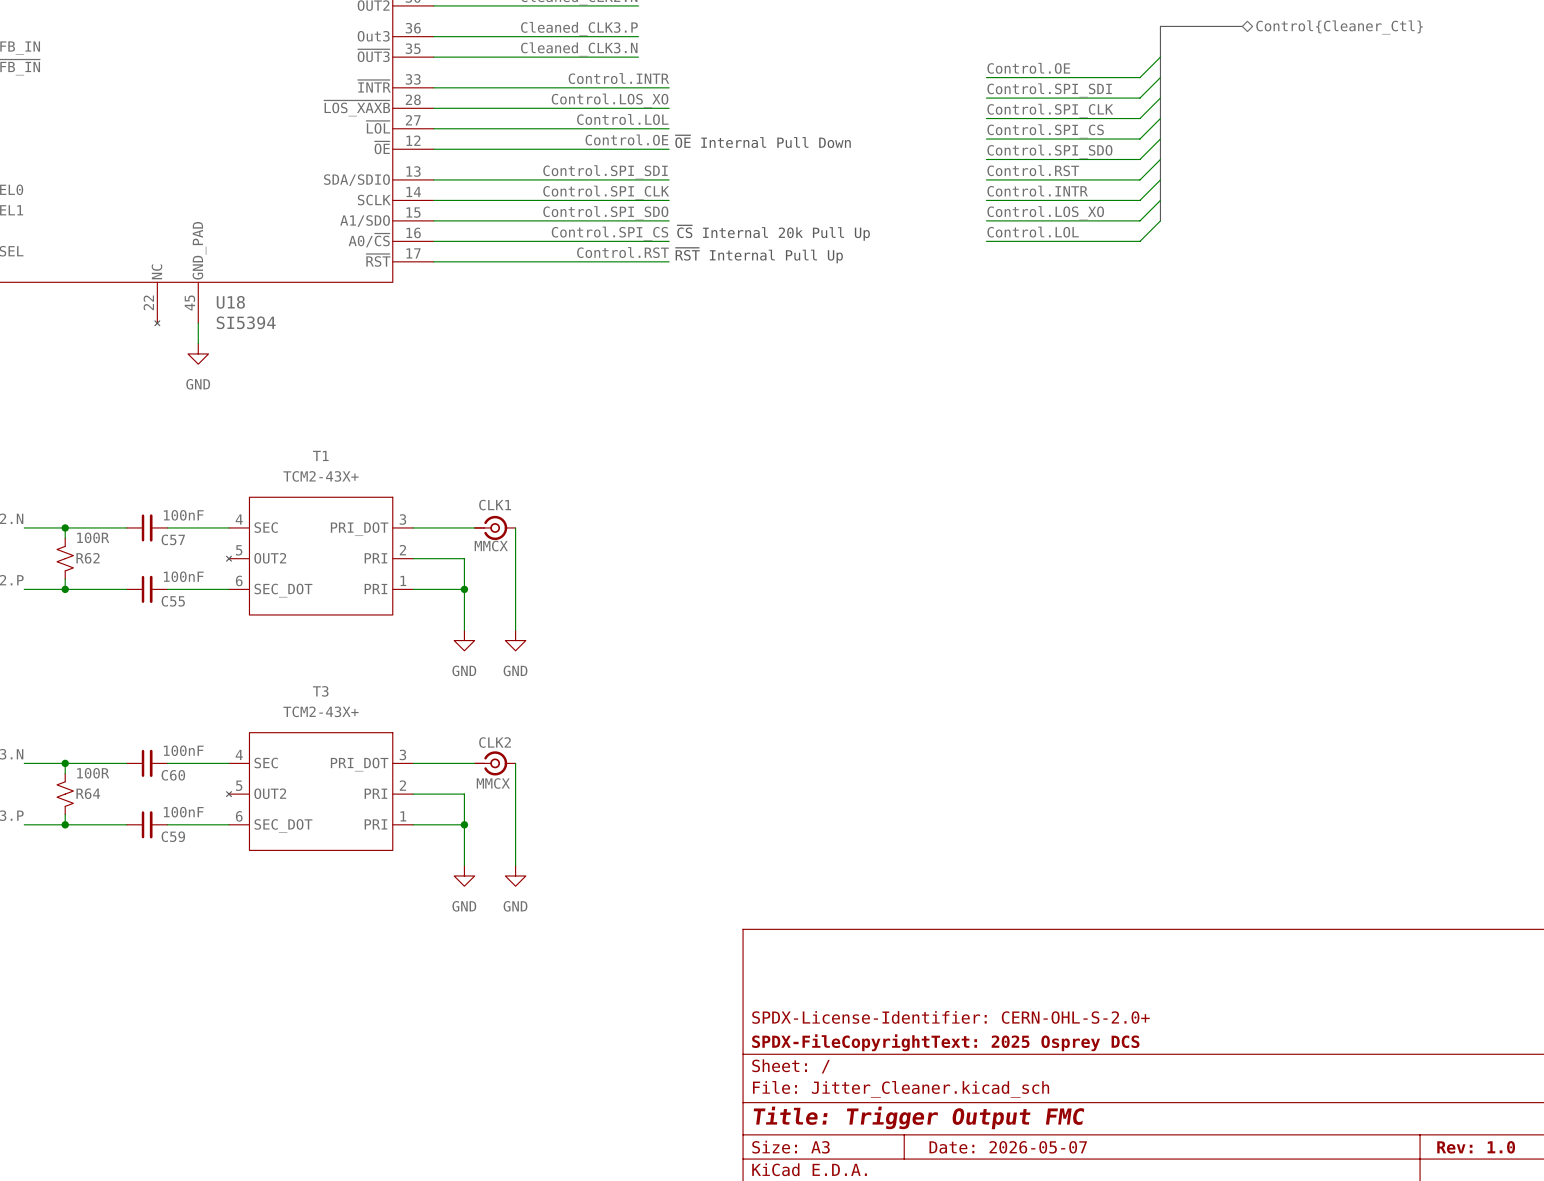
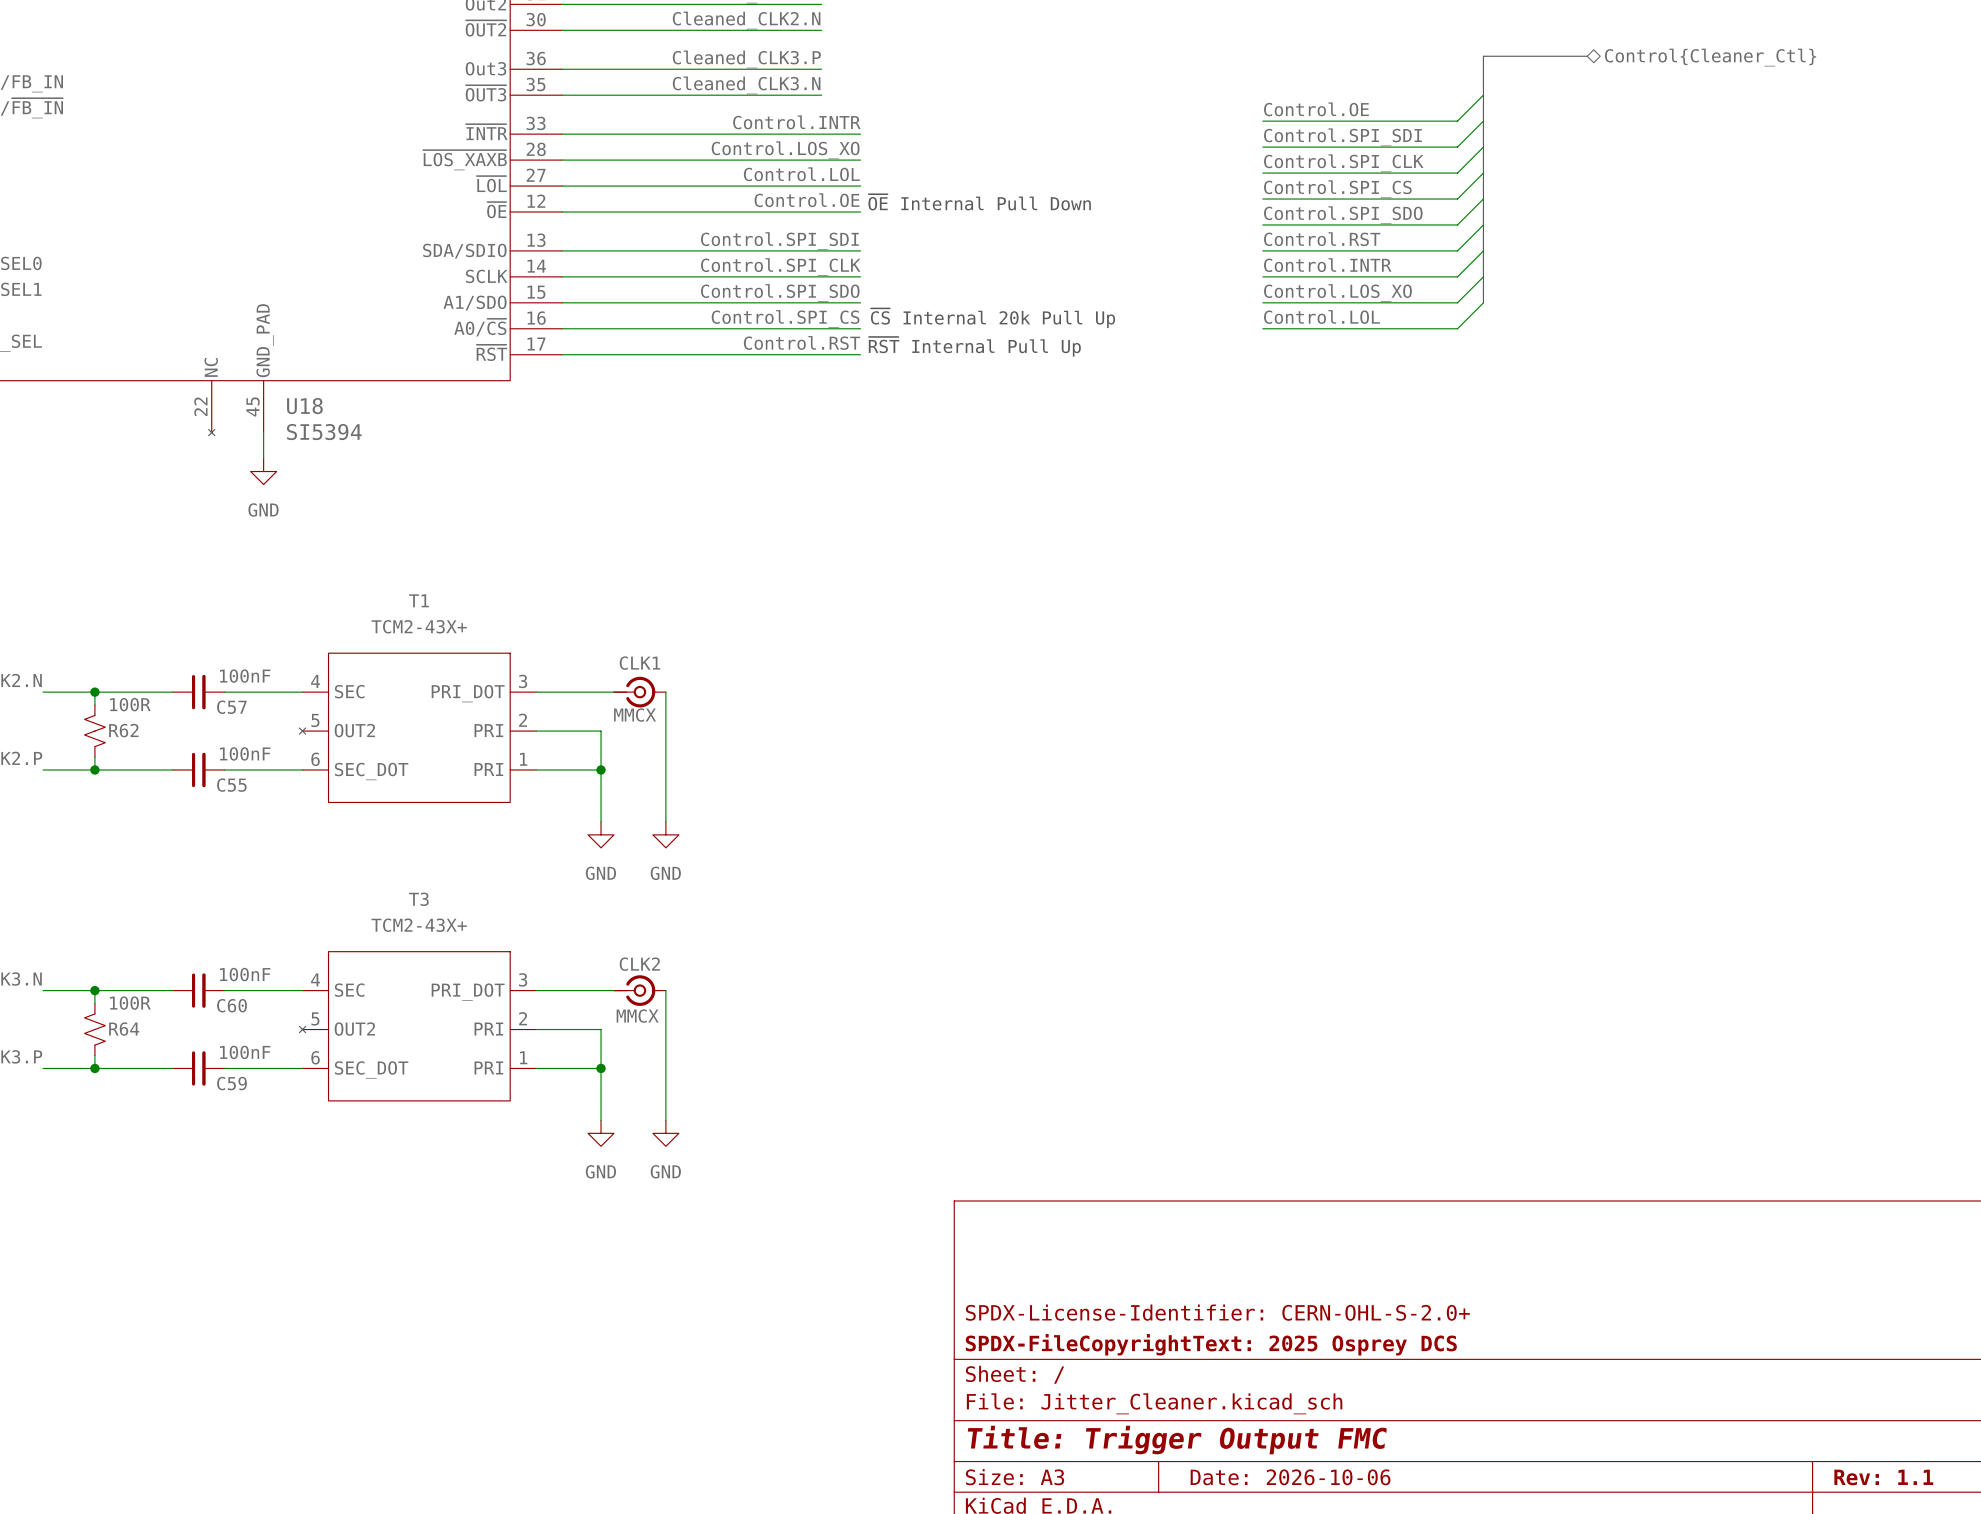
title block: Date: 2026-05-07 (1008, 1147) -> Date: 2026-10-06 (1290, 1477)
title block: Rev: 1.0 (1476, 1147) -> Rev: 1.1 (1883, 1477)

